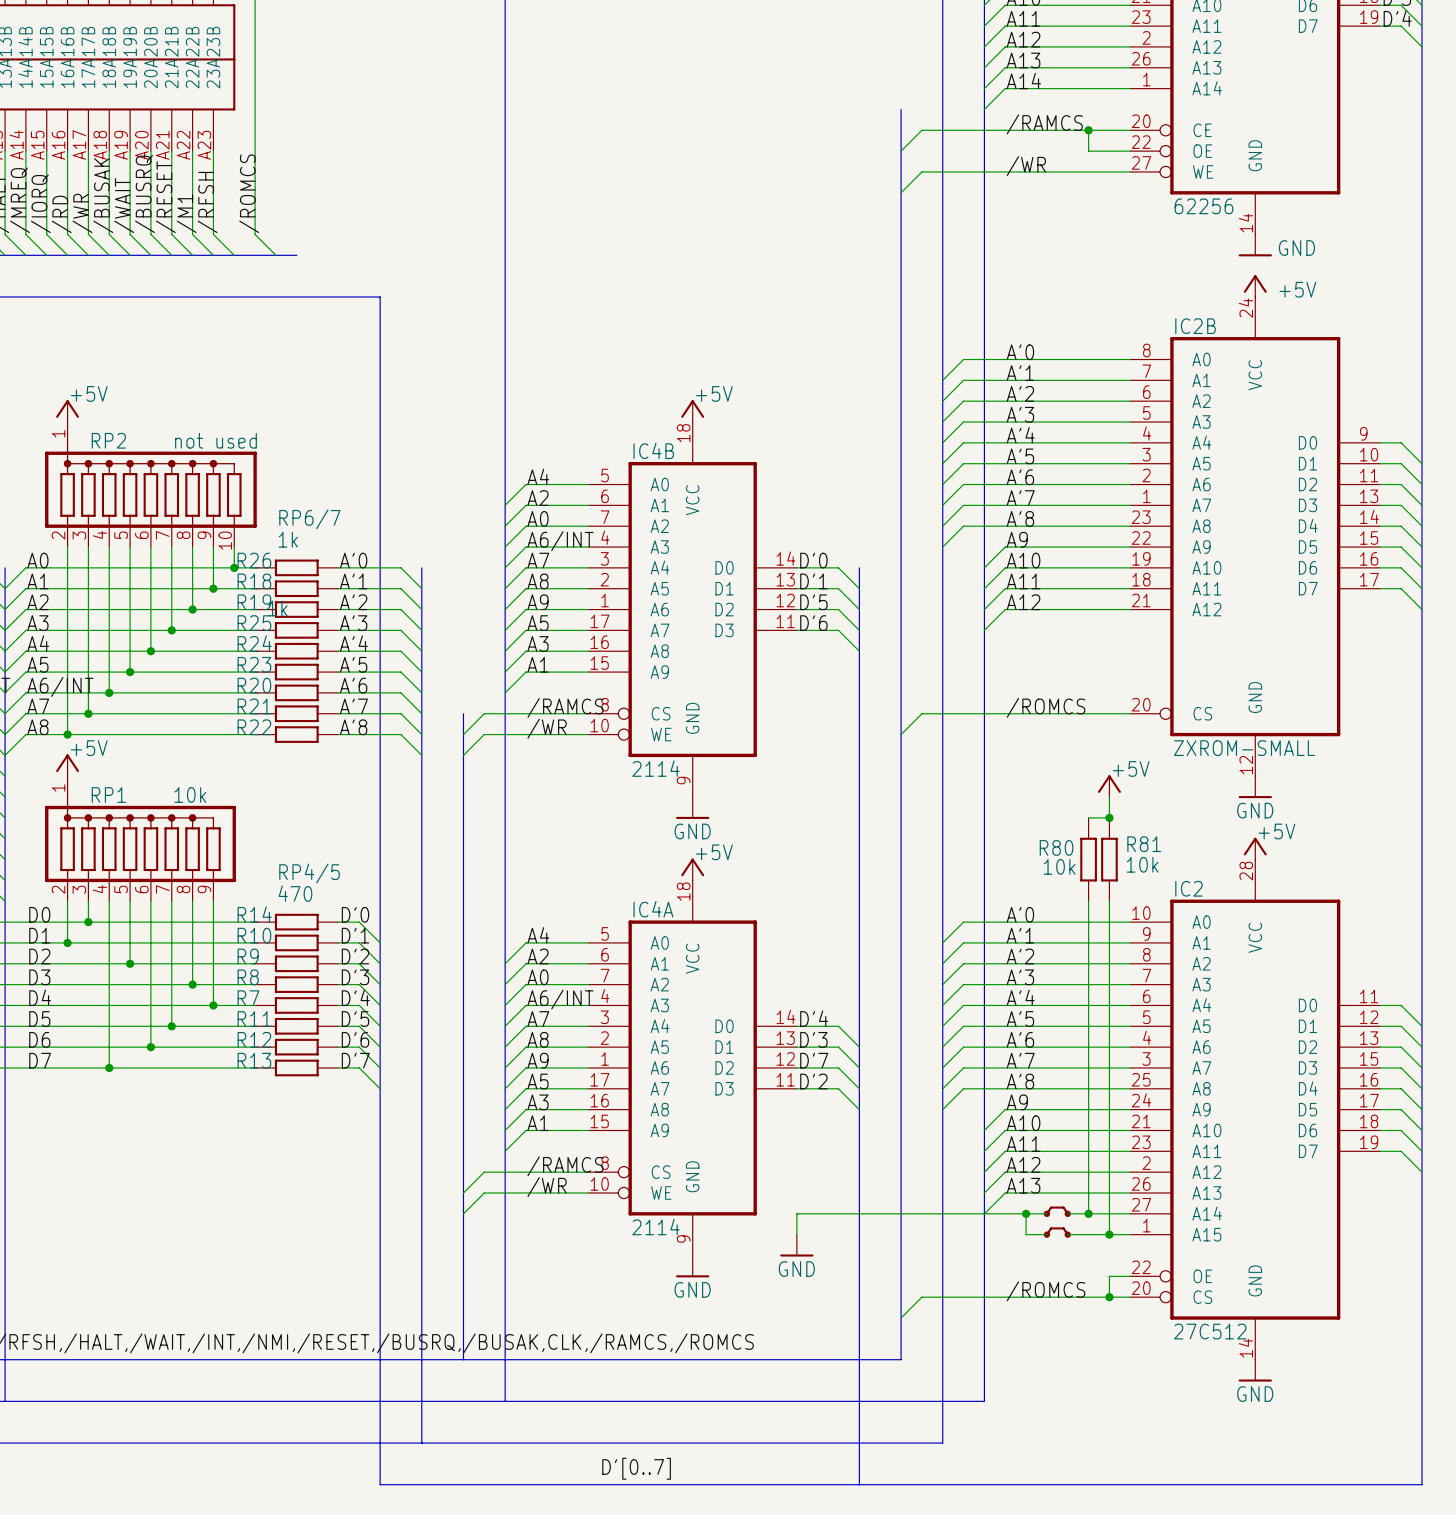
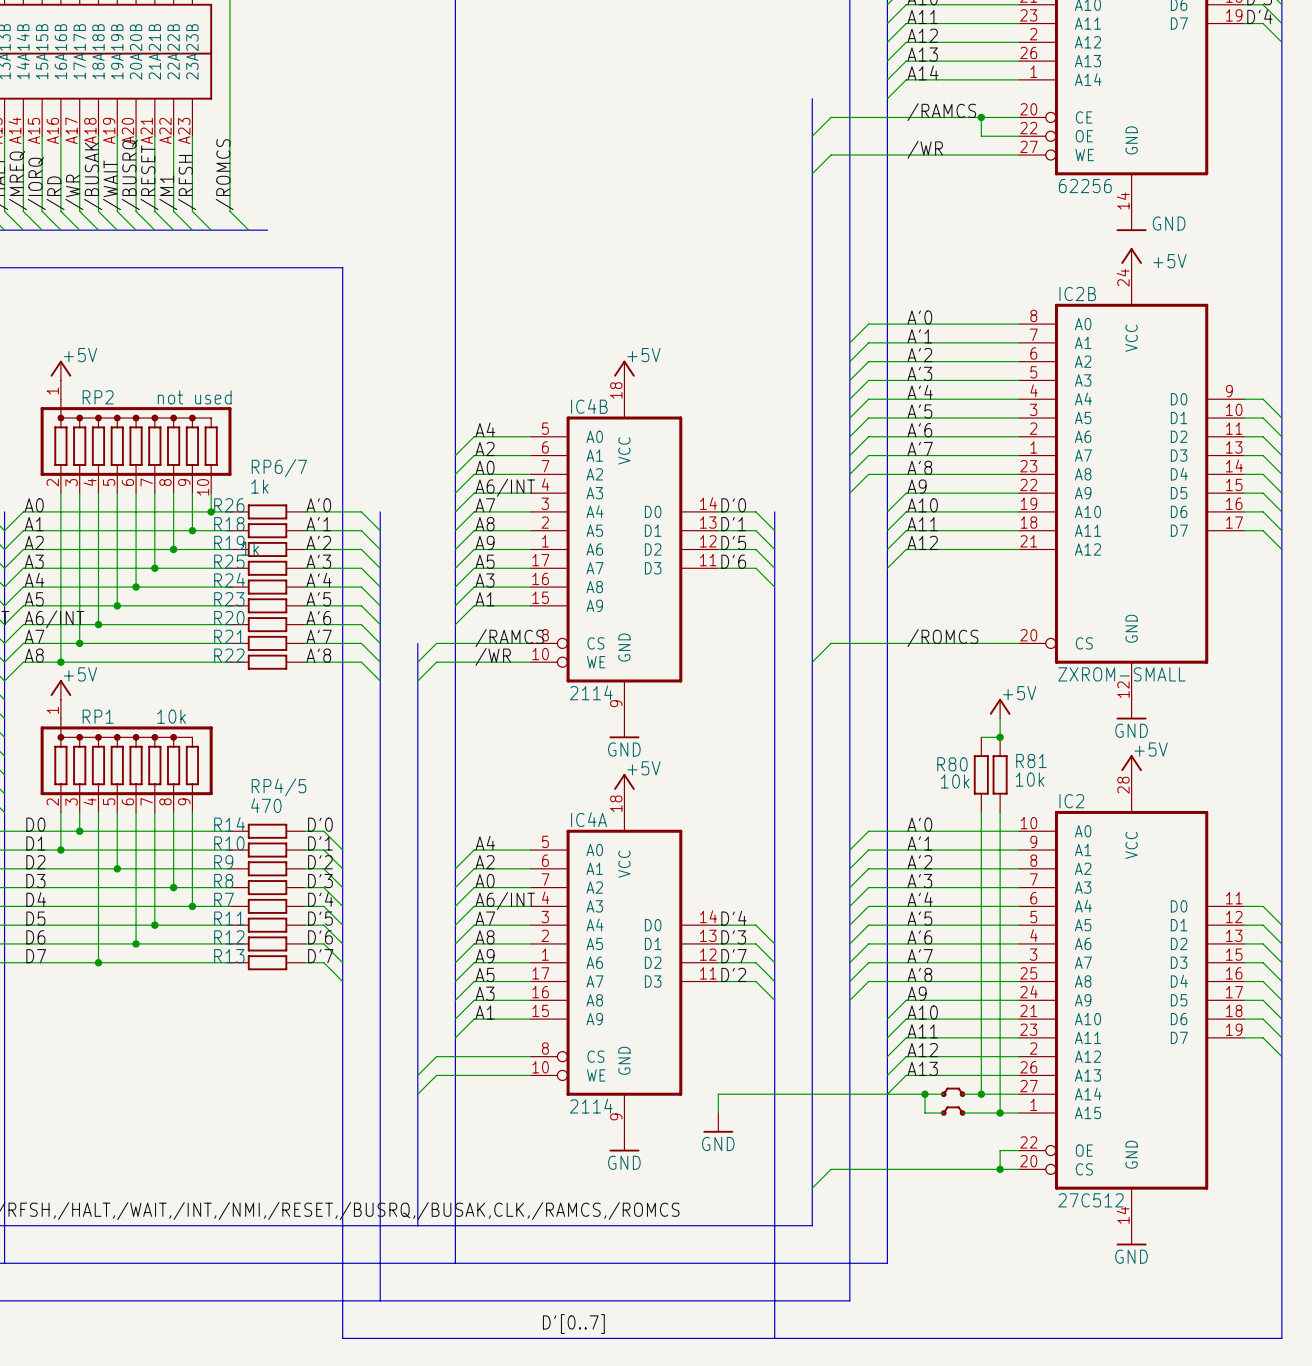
label: /RAMCS (565, 1166) -> none
label: /WR (547, 1187) -> none
label: /ROMCS (1046, 1291) -> none

